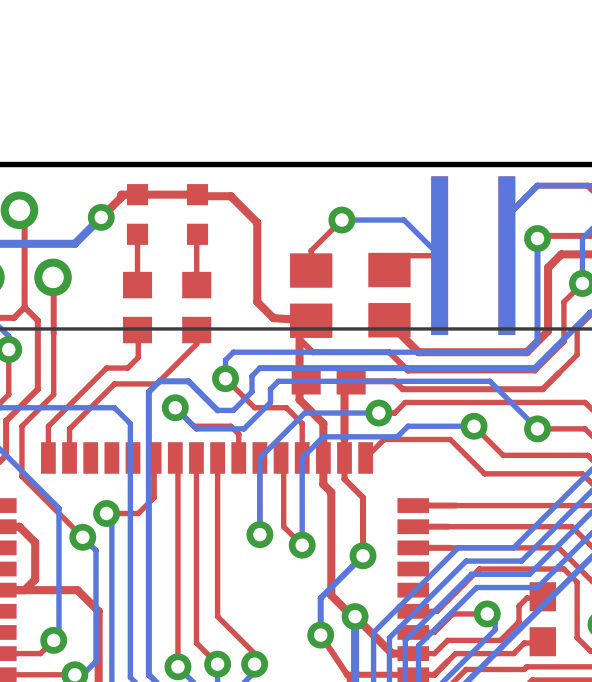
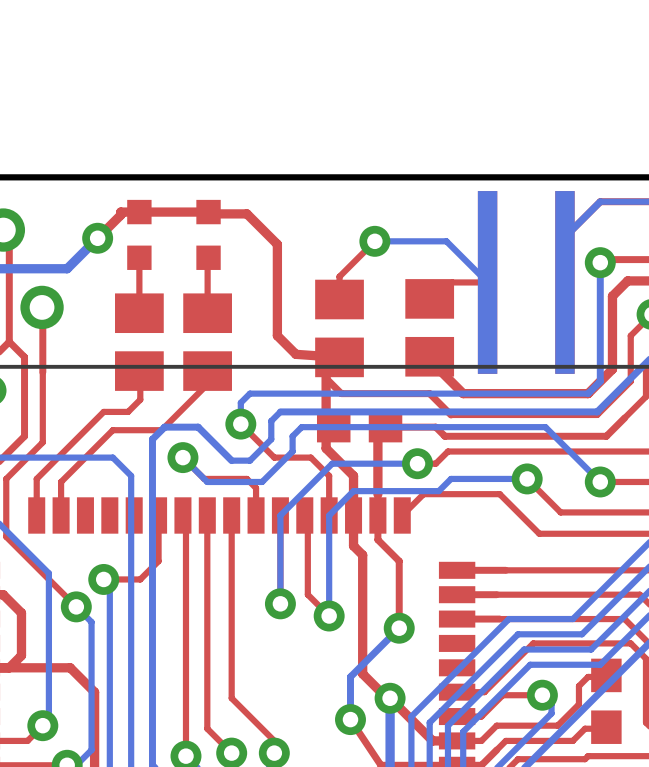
part footprint: [122, 271, 153, 344] -> [115, 293, 164, 391]
part footprint: [182, 271, 212, 344] -> [183, 293, 232, 391]

